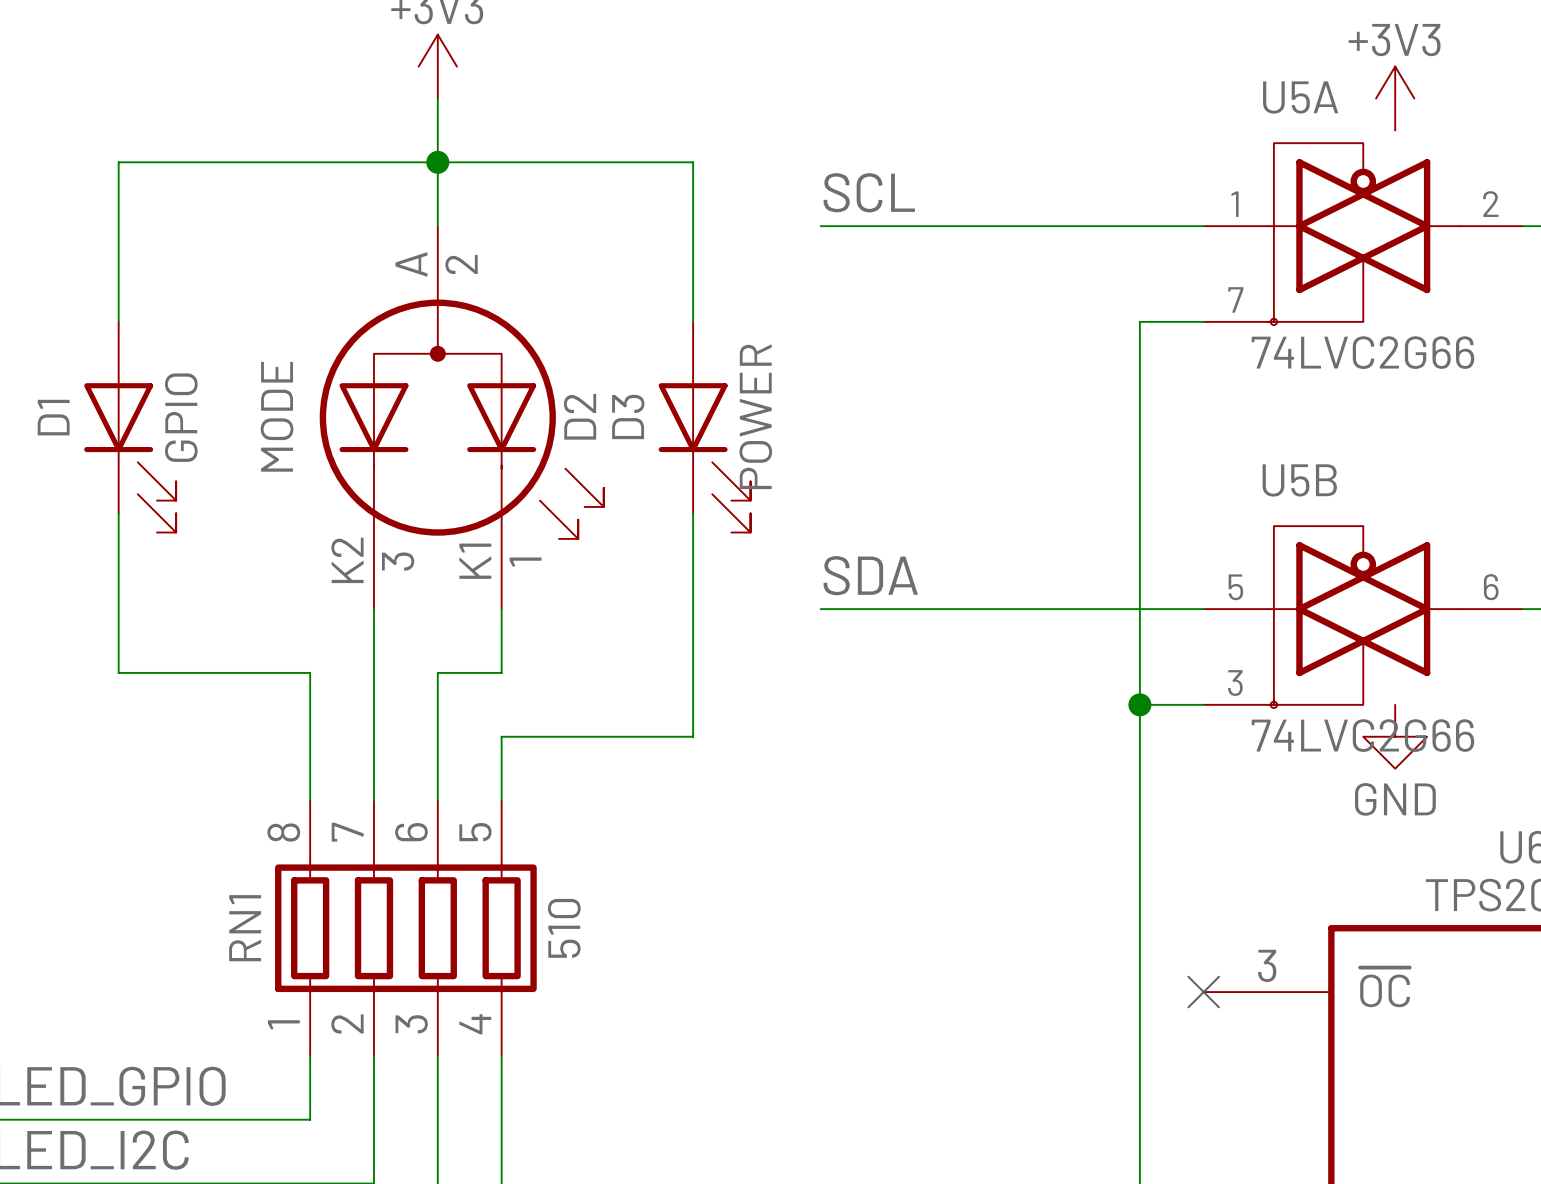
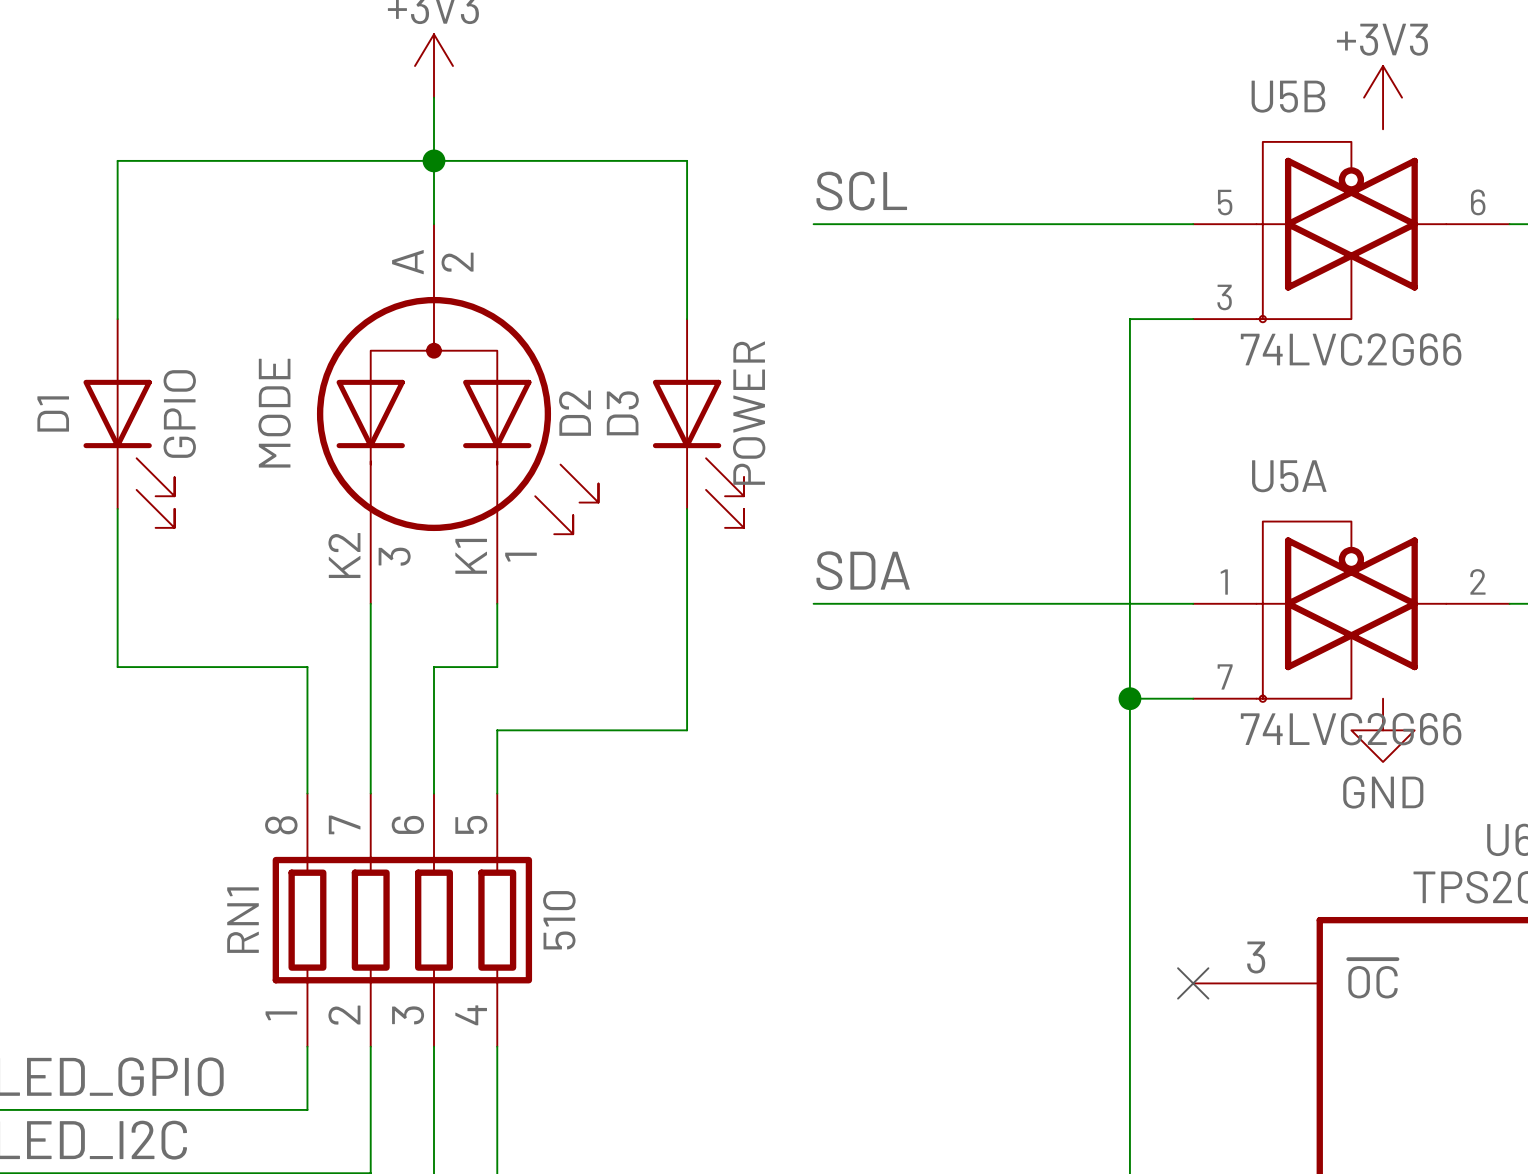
U5A position: (1363, 234) -> (1351, 611)
U5B position: (1363, 617) -> (1351, 232)

